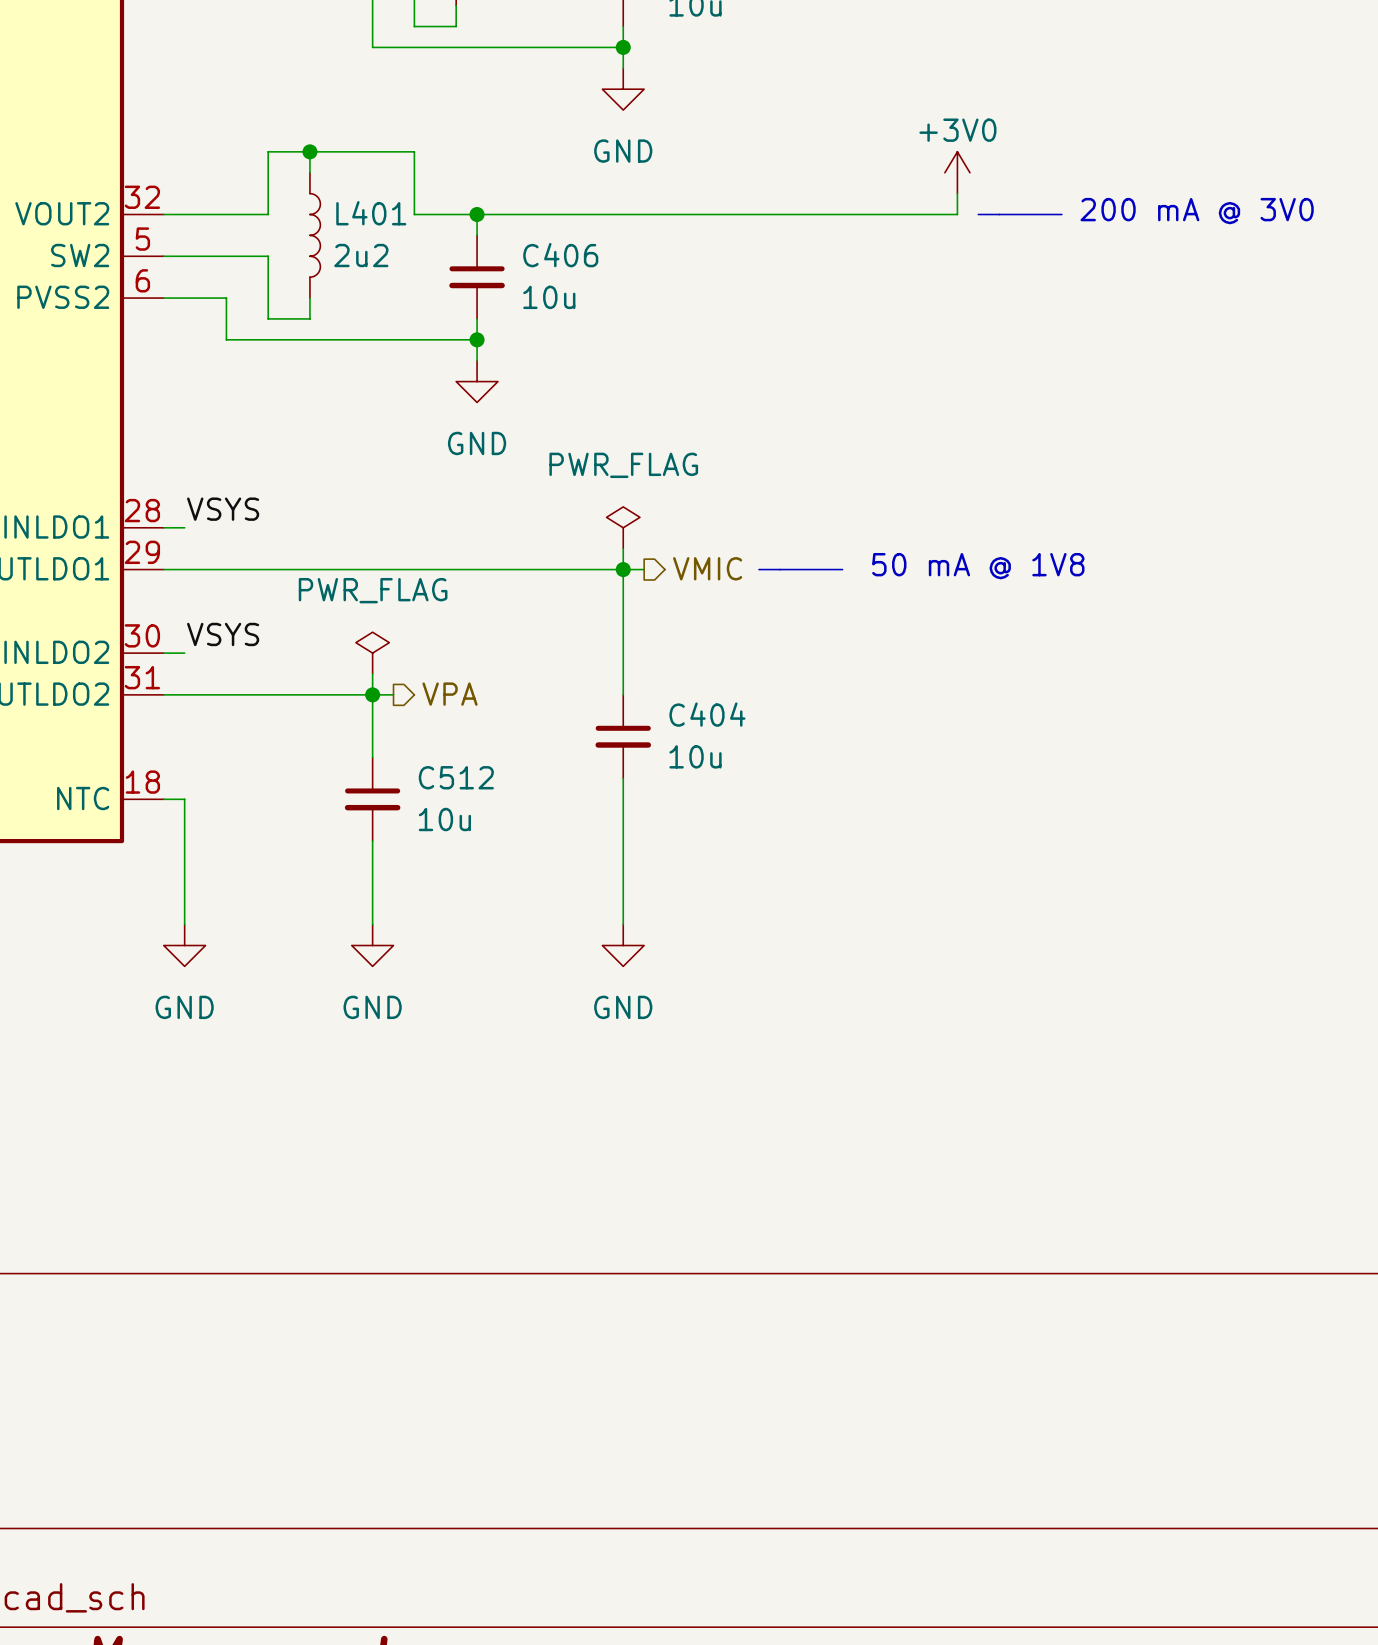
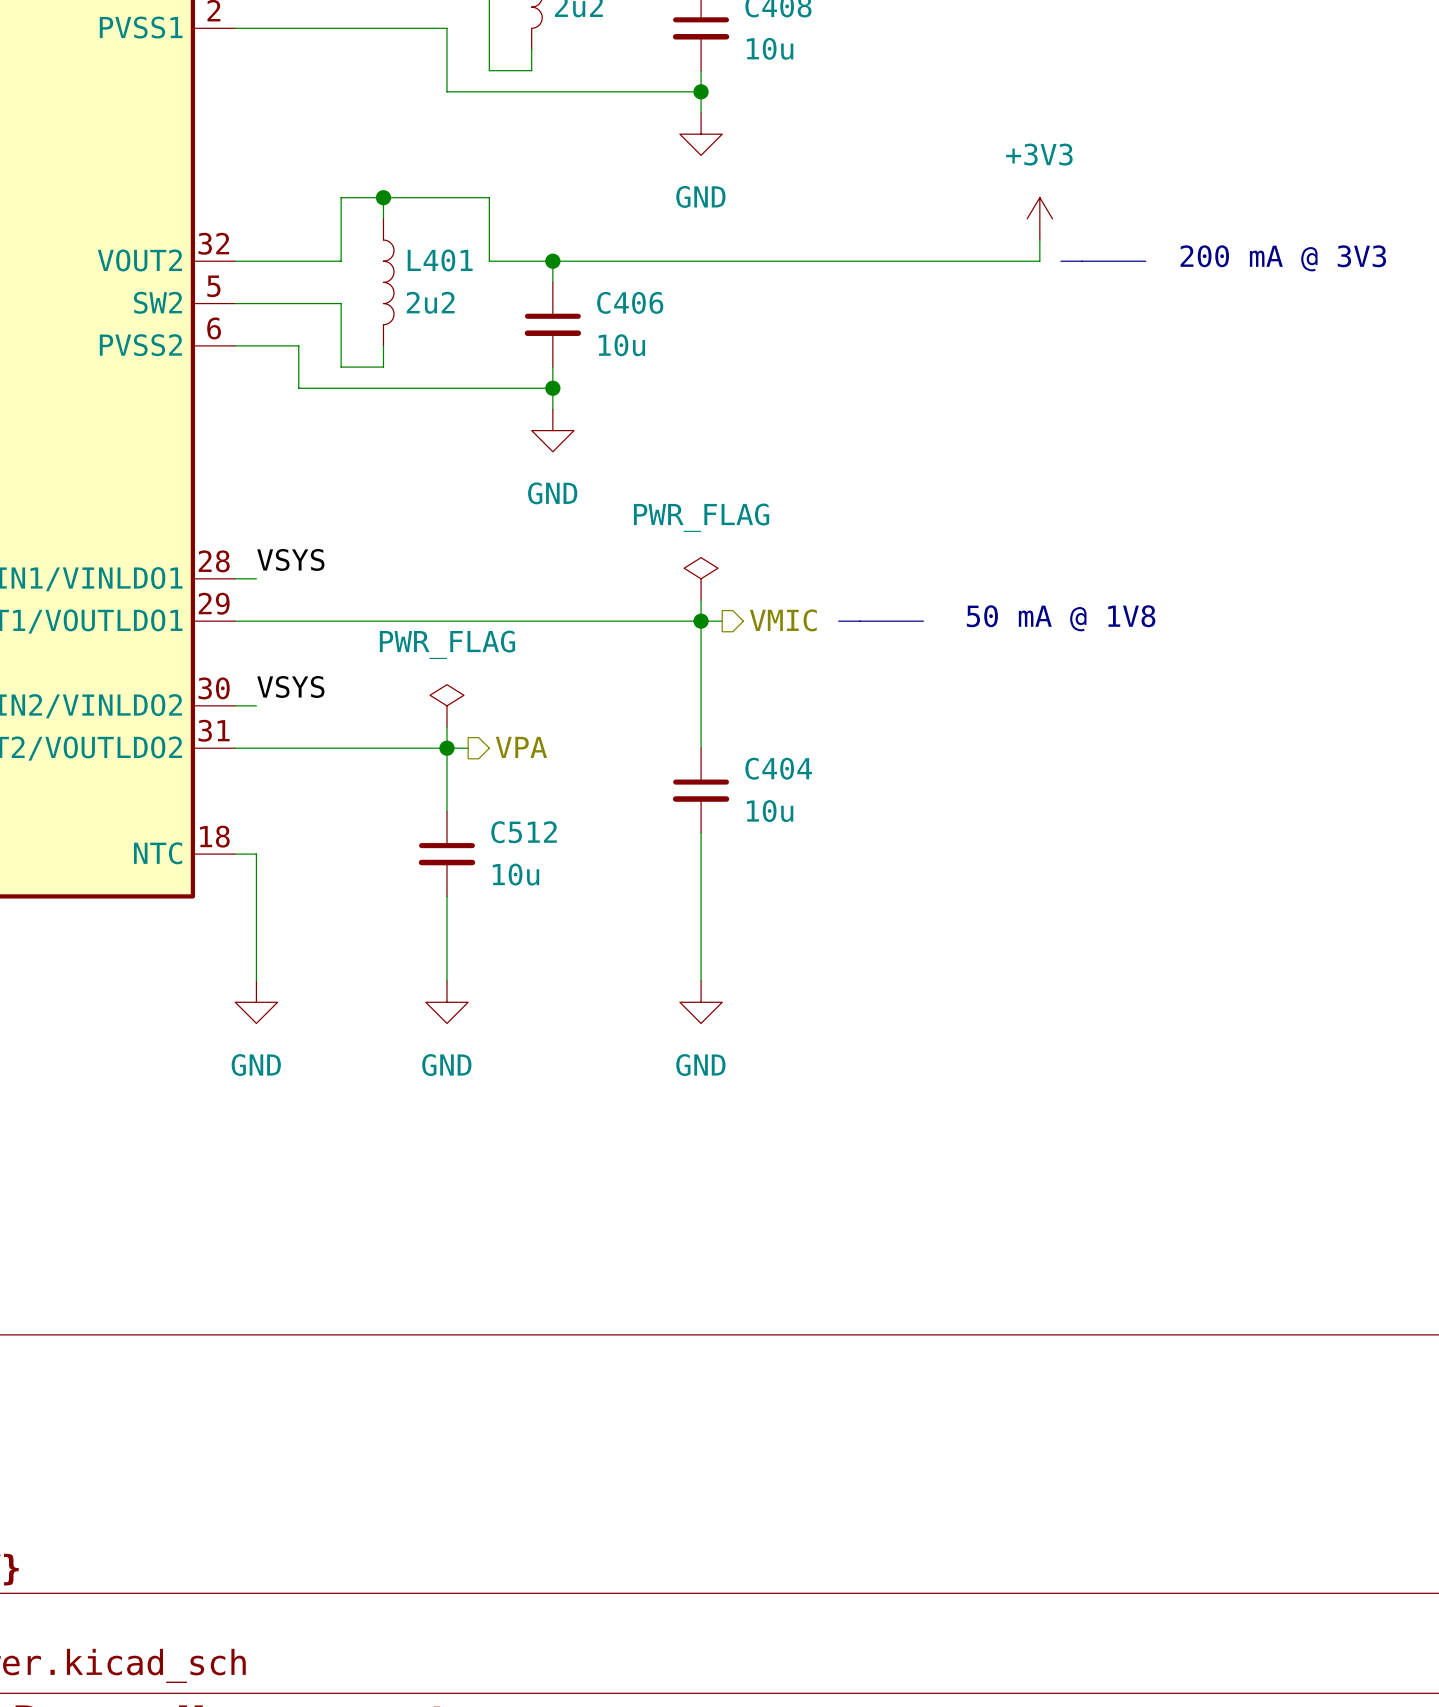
power symbol: +3V0 (957, 172) -> +3V3 (1039, 218)
text: 200 mA @ 3V0 (1197, 211) -> 200 mA @ 3V3 (1283, 258)

